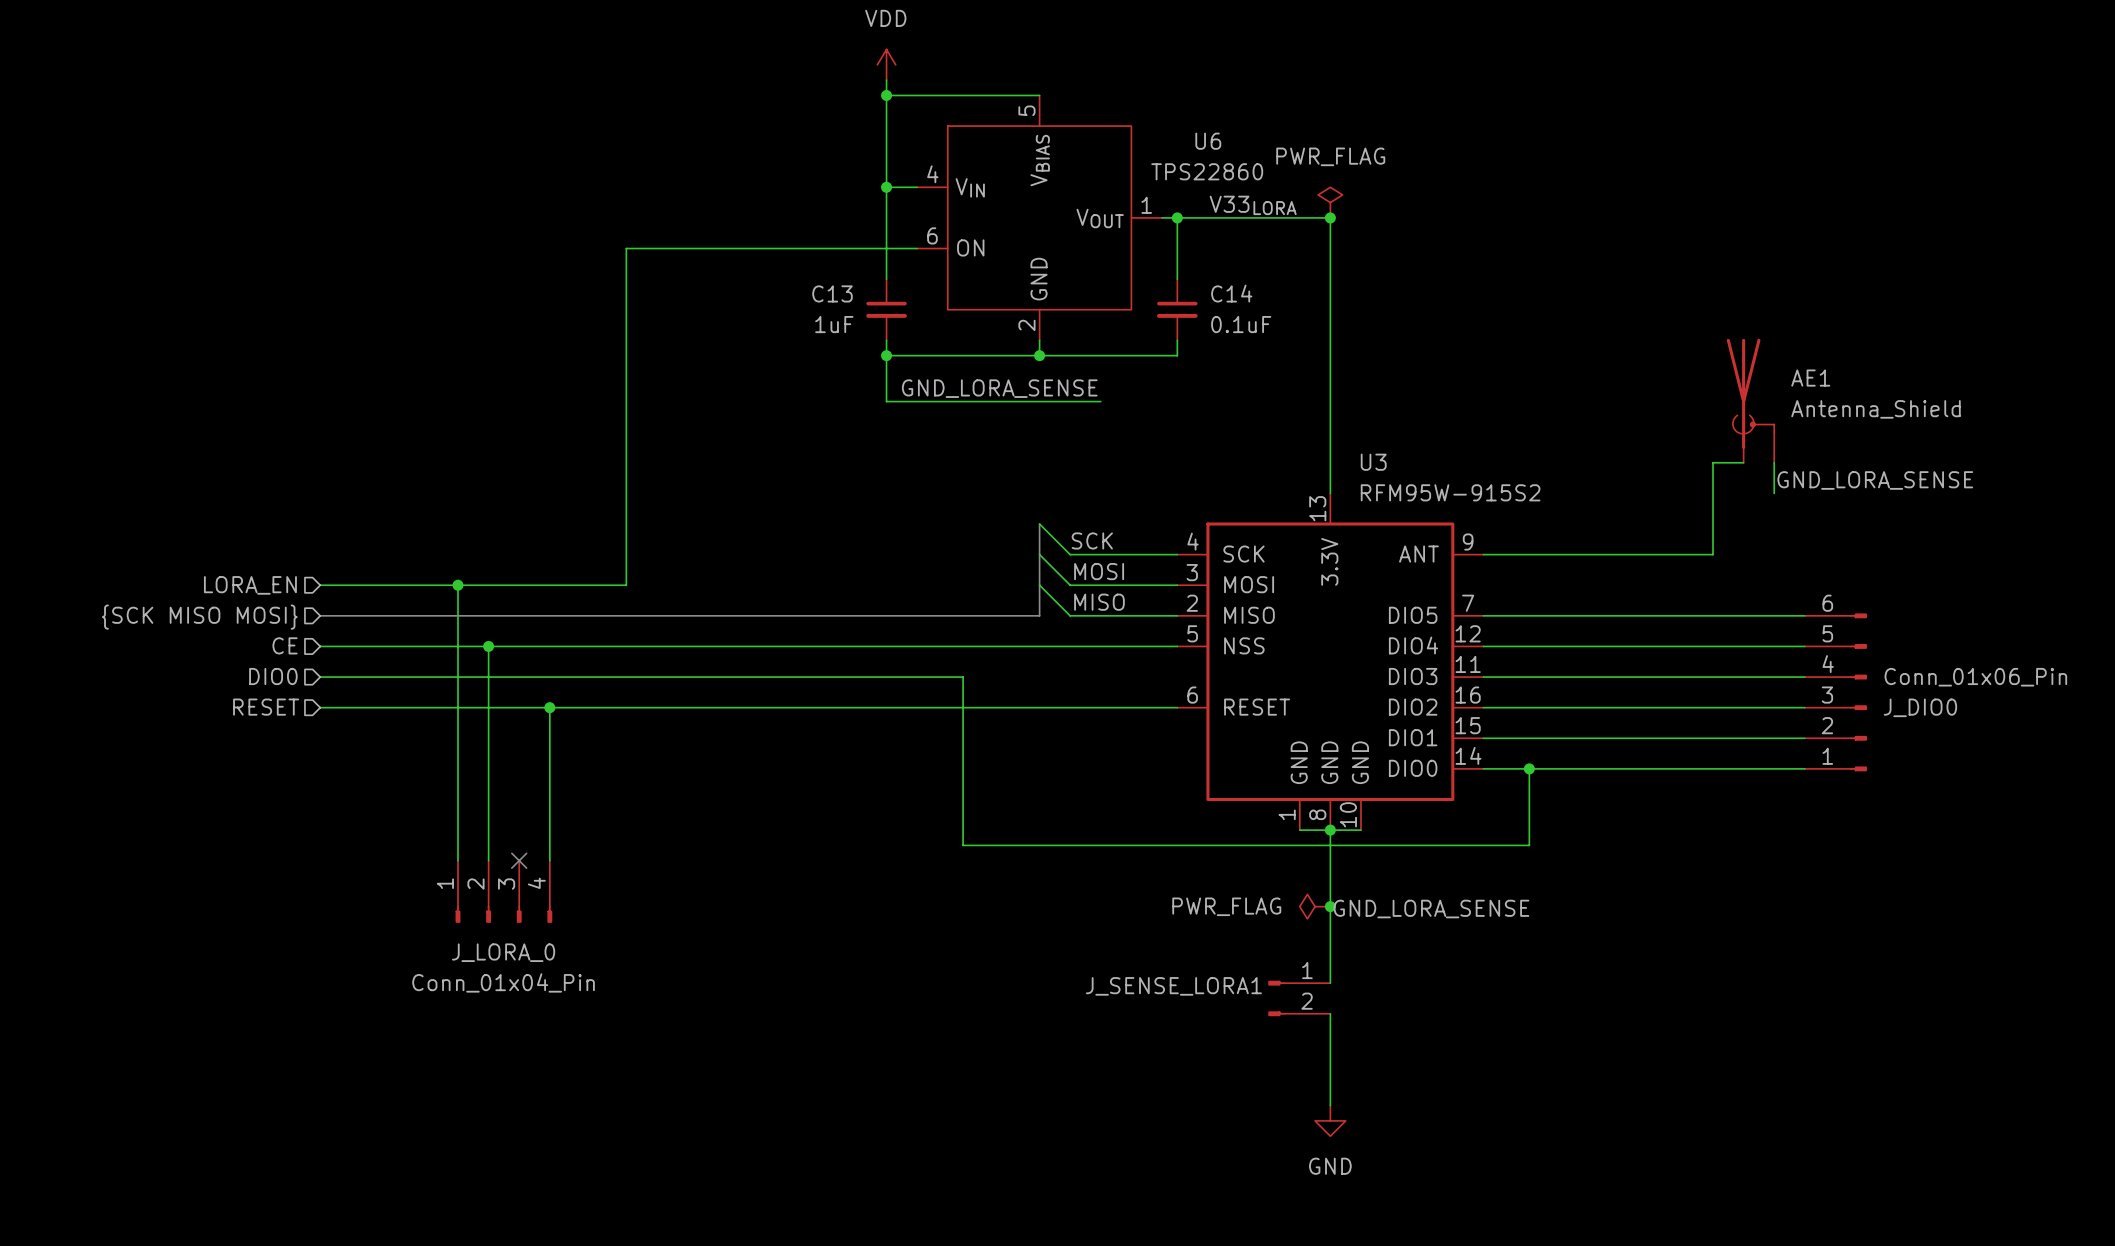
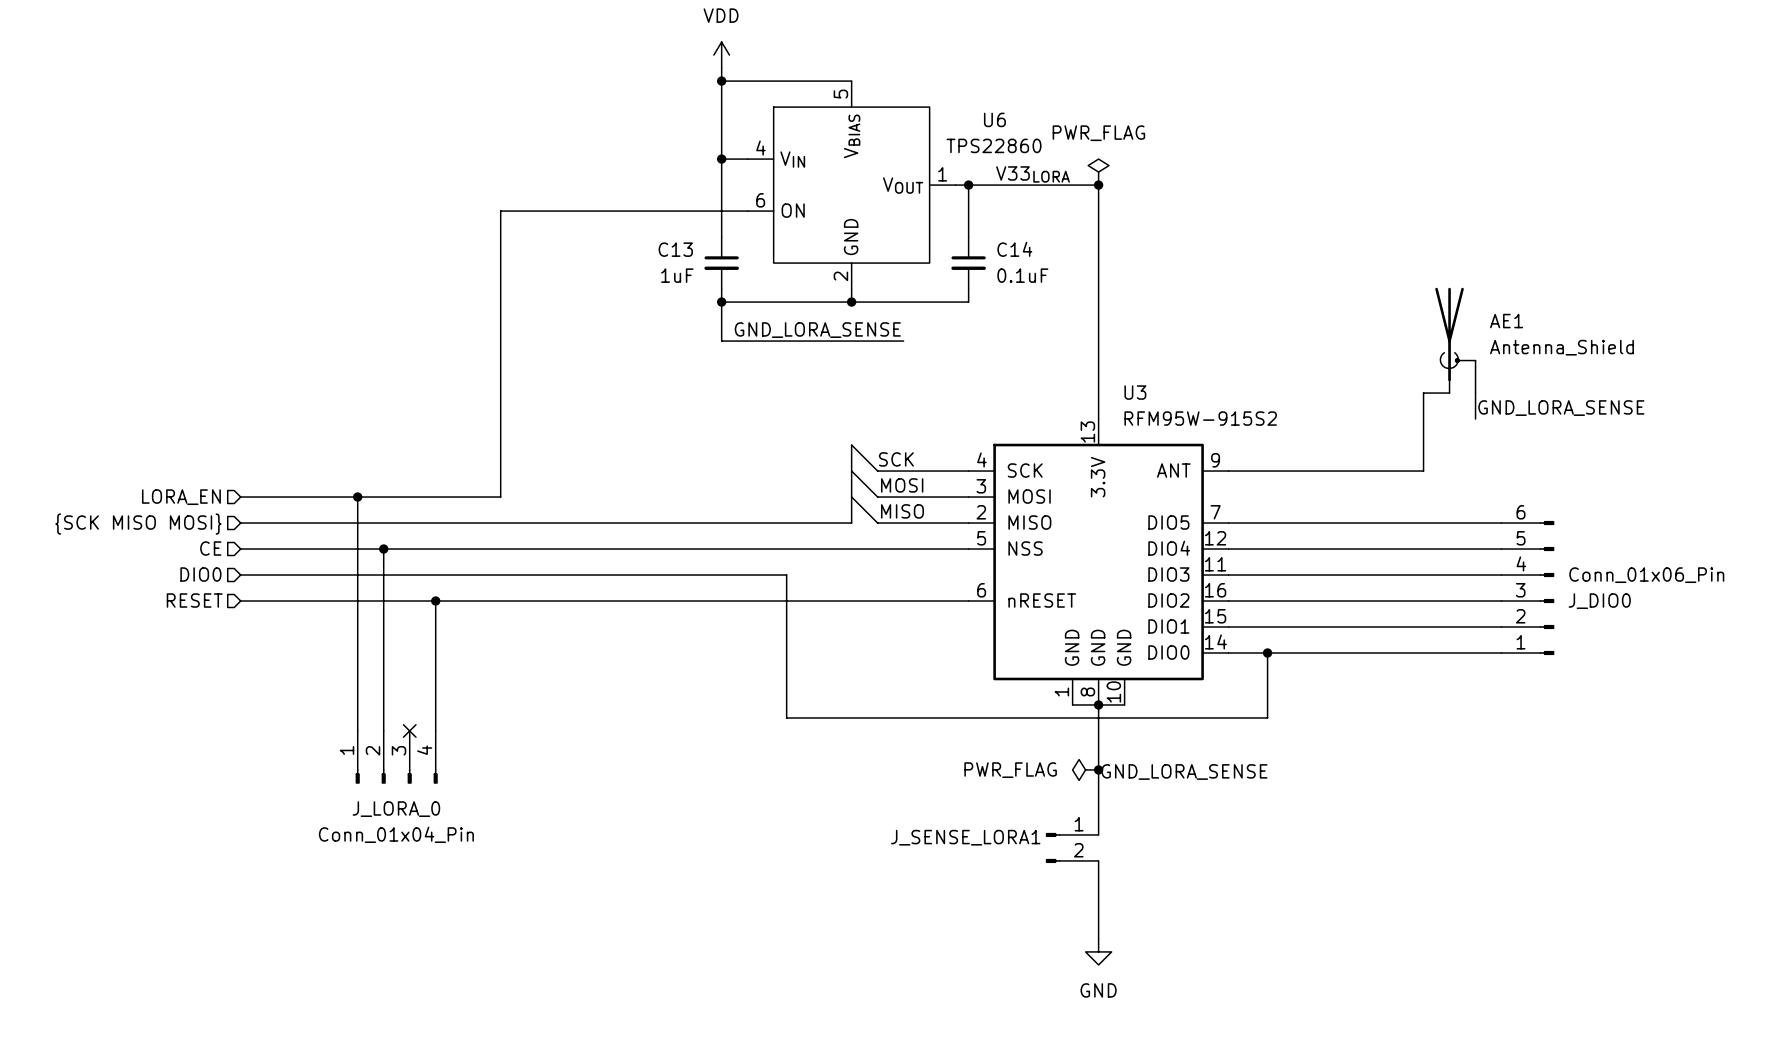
U3 pin name: RESET (1257, 707) -> nRESET (1042, 600)

